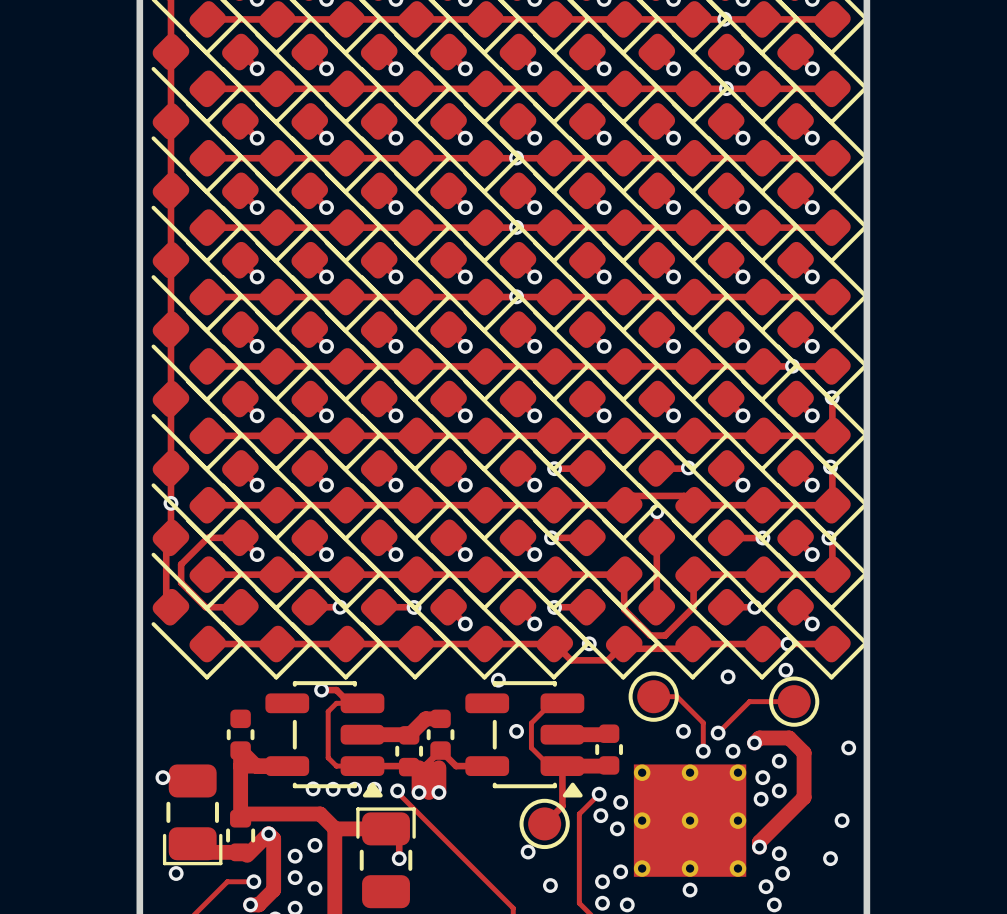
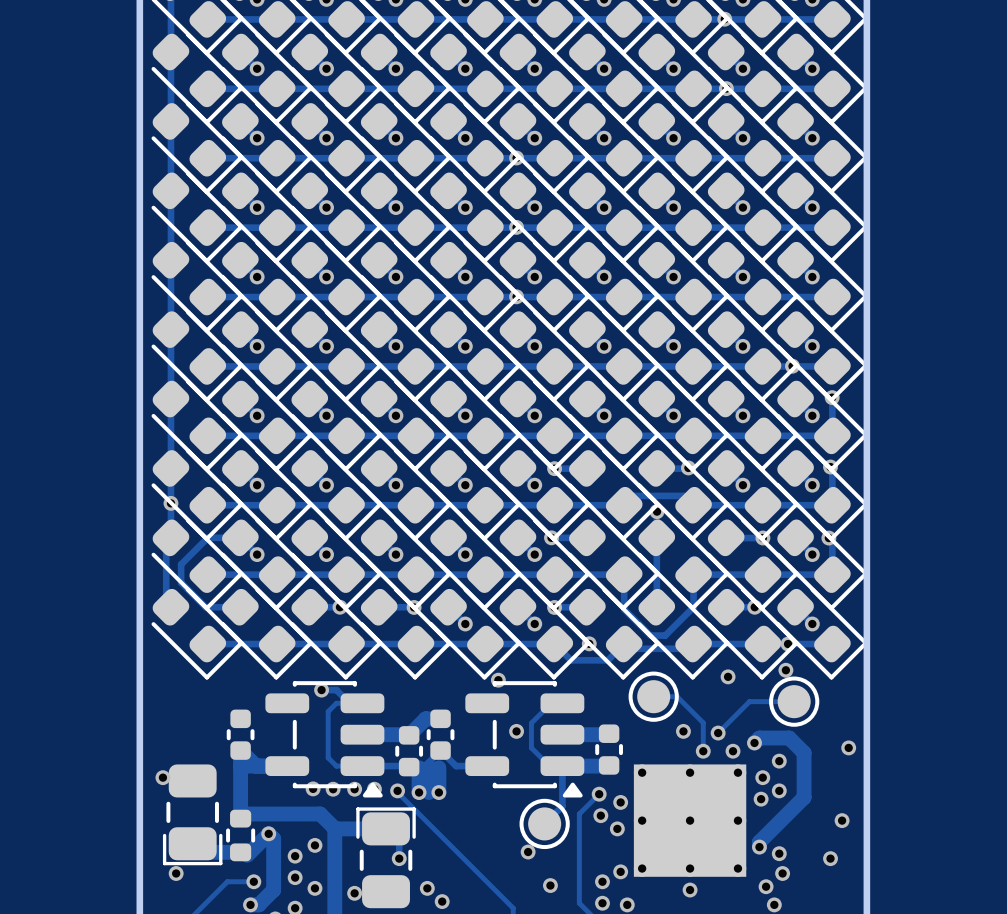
via: none -> (427, 888)
via: none -> (354, 893)
via: none -> (442, 901)

